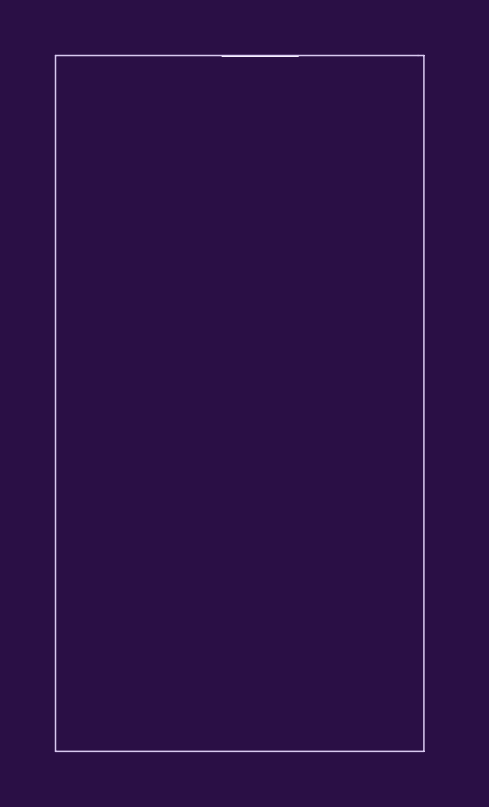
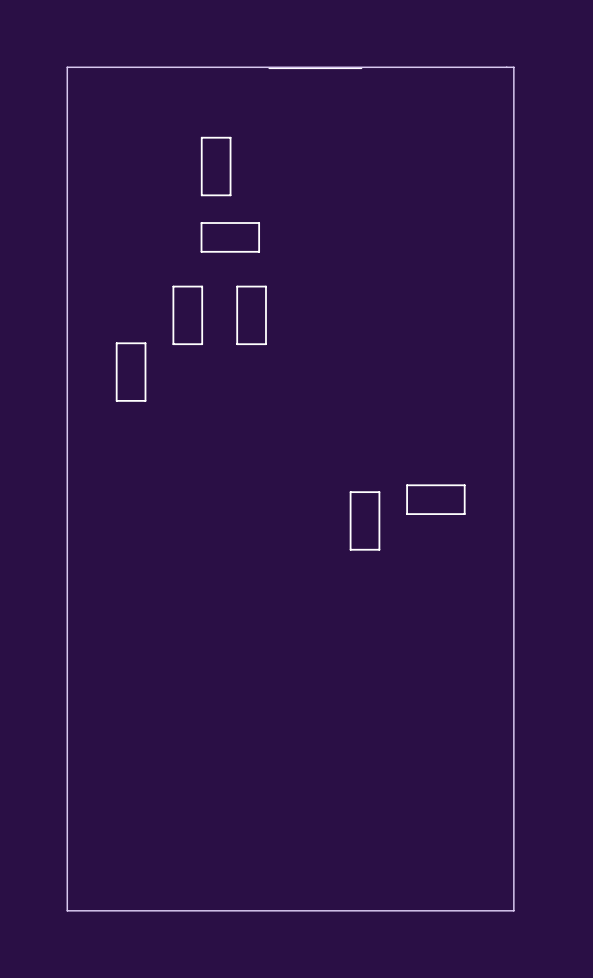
part: none -> (216, 166)
part: none -> (230, 237)
part: none -> (187, 315)
part: none -> (251, 315)
part: none -> (131, 372)
part: none -> (435, 499)
part: none -> (365, 520)

